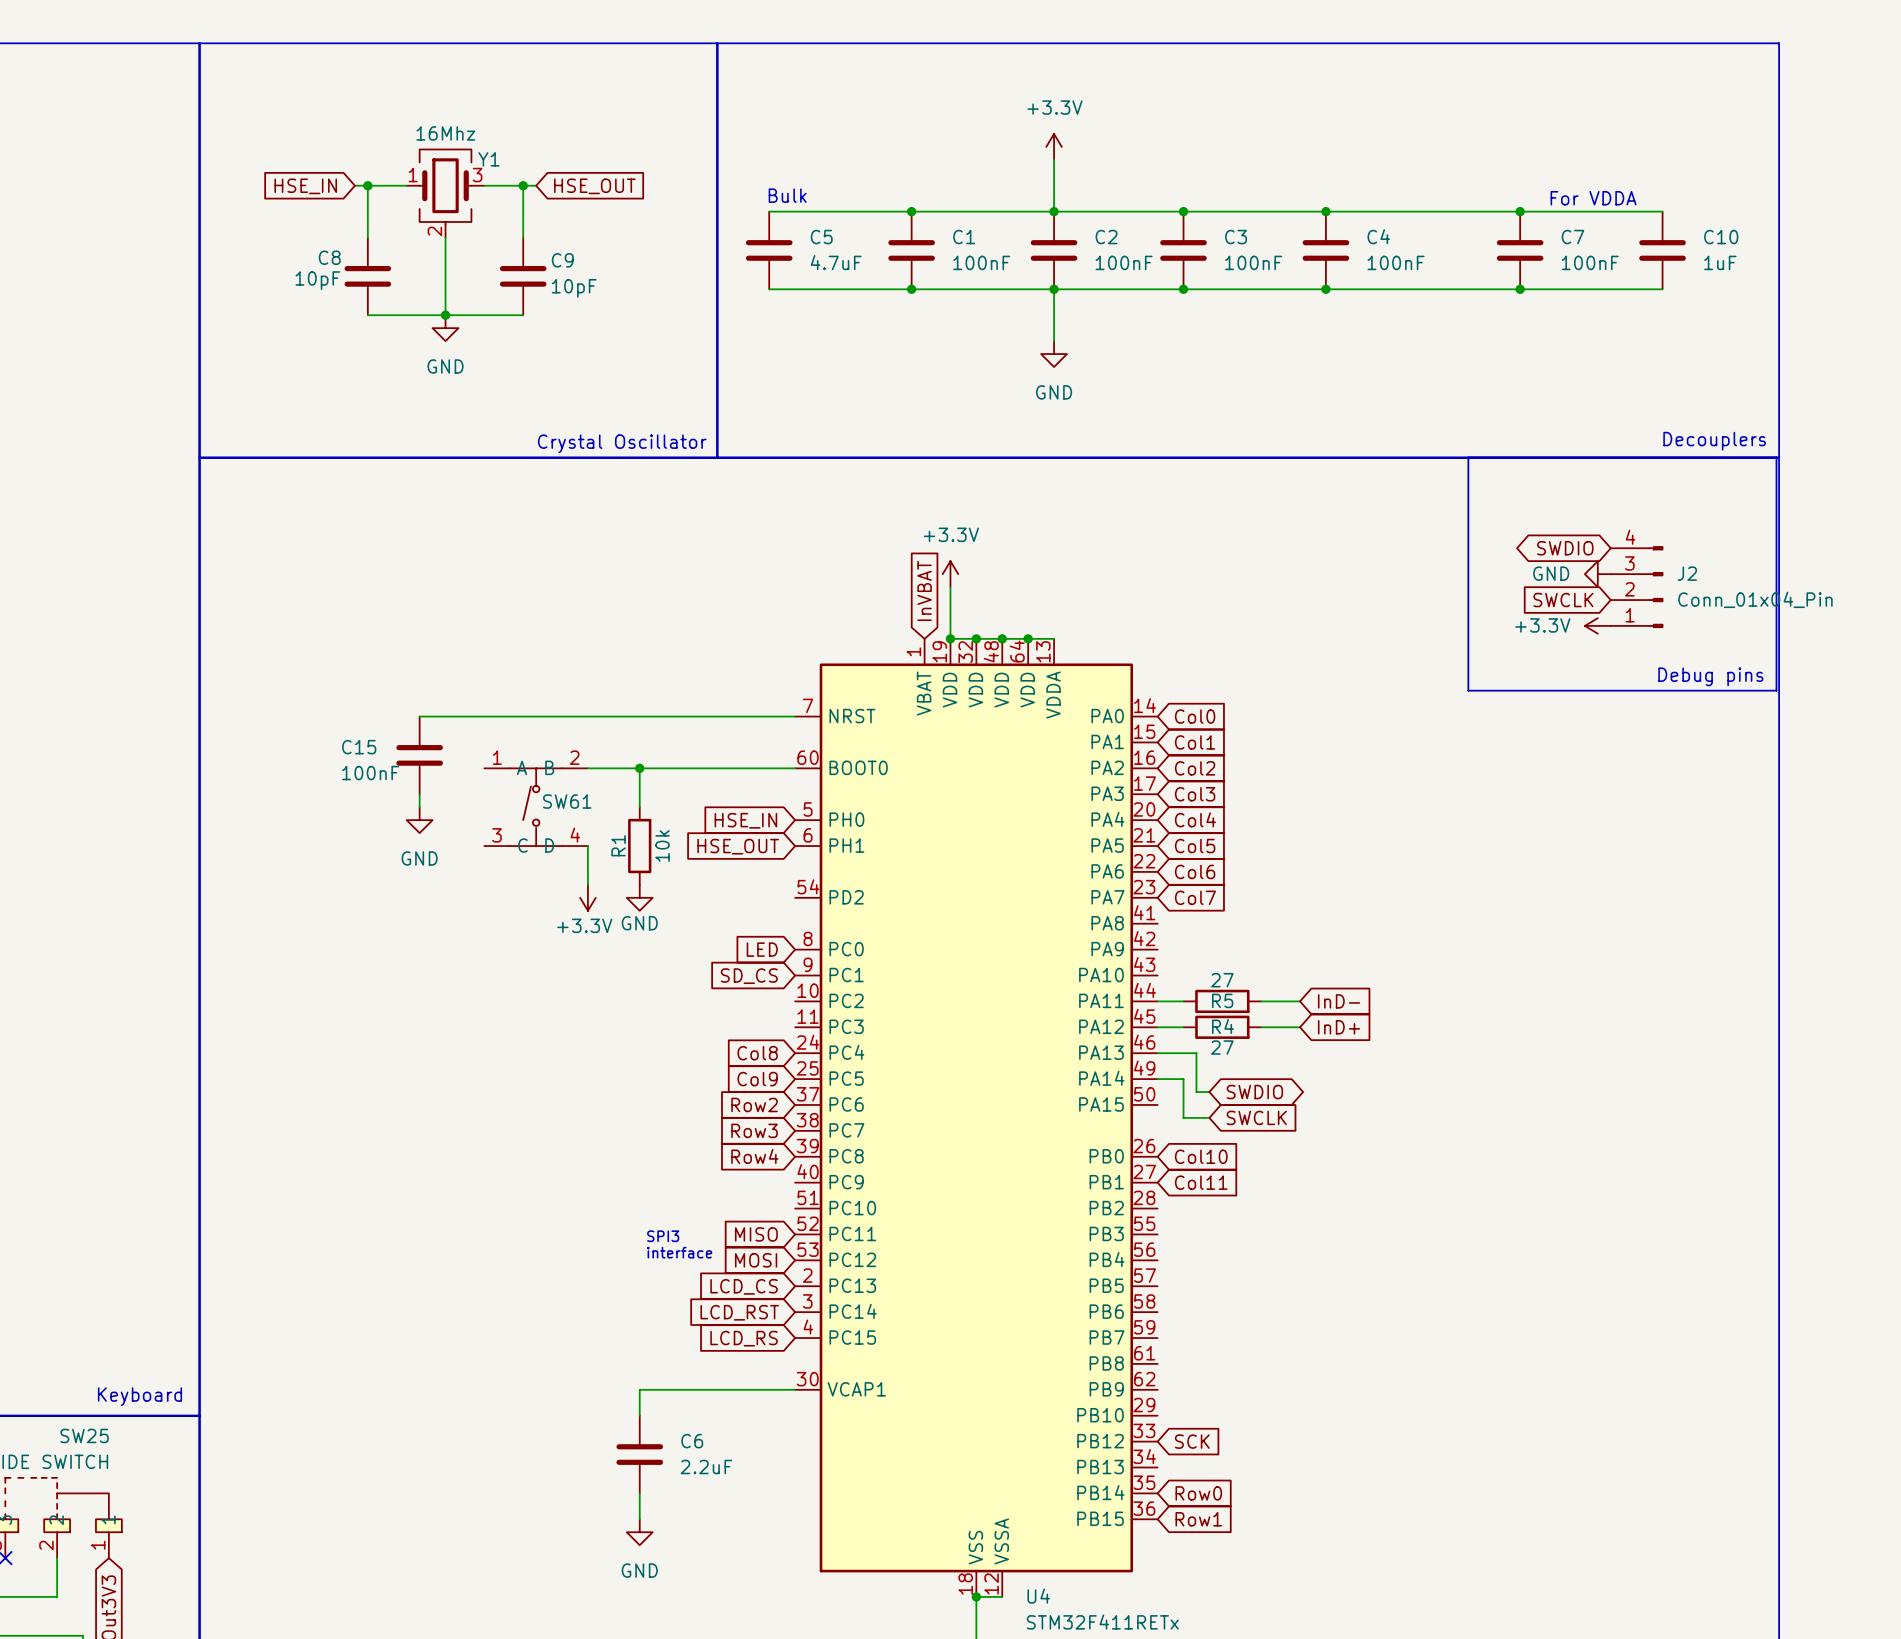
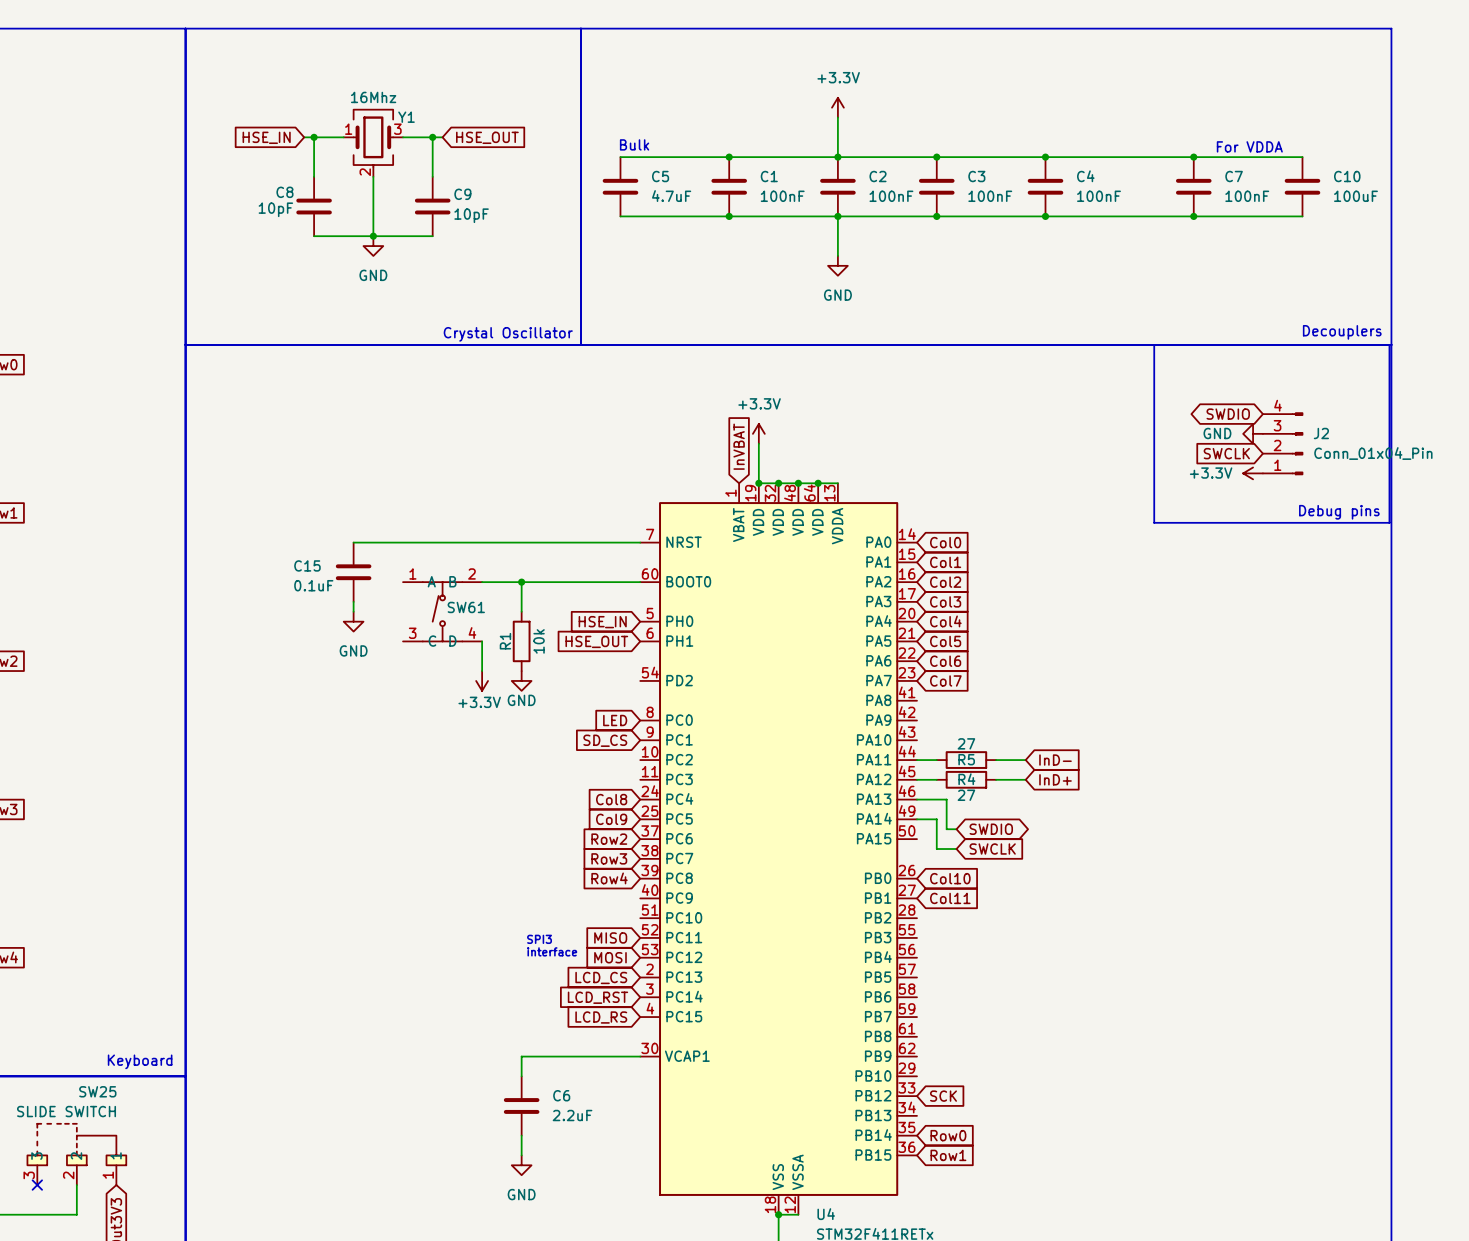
C10 value: 1uF (1720, 262) -> 100uF (1355, 196)
C15 value: 100nF (370, 773) -> 0.1uF (313, 585)

